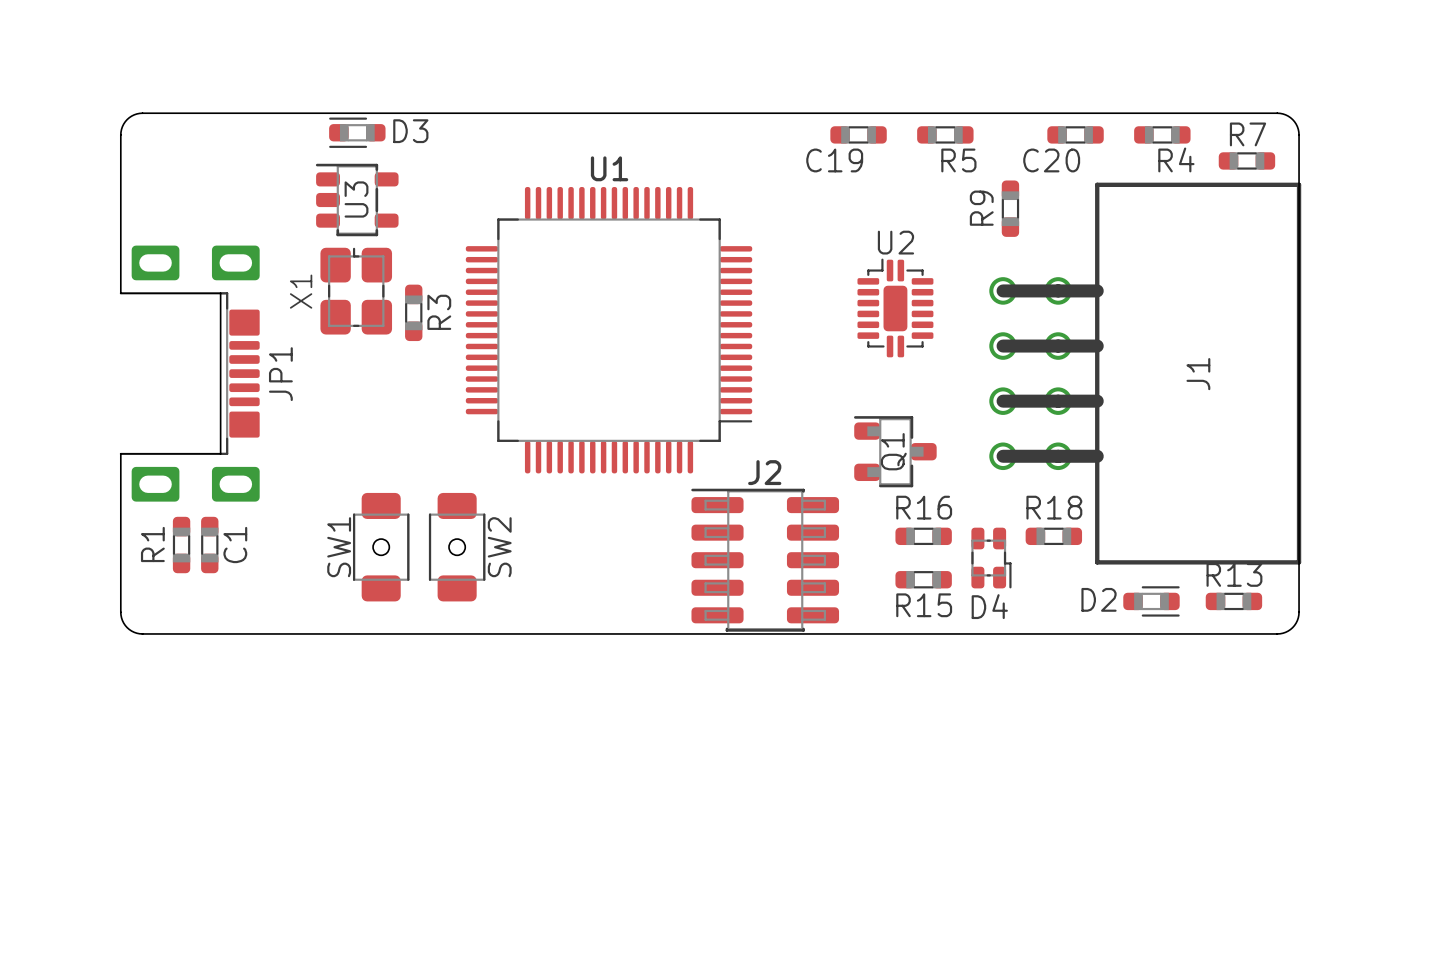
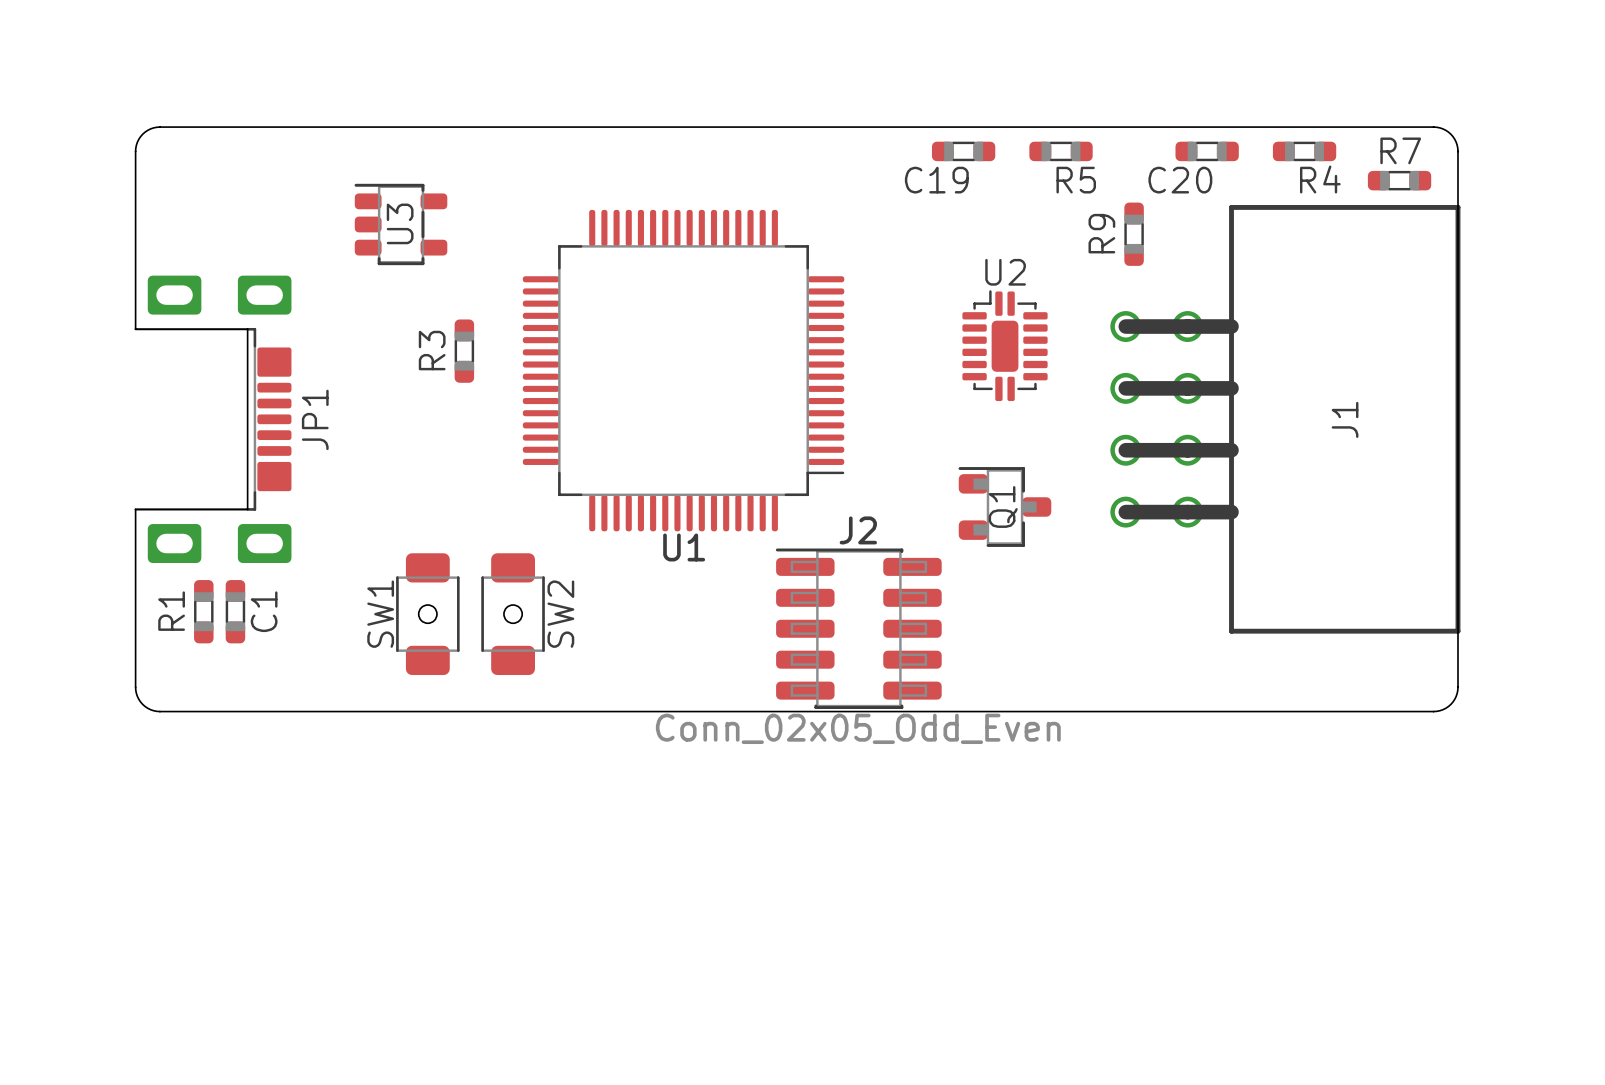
D3: (357, 132) -> none
U1 name position: U1 (609, 168) -> U1 (684, 547)
X1: (356, 291) -> none
R3 name position: R3 (439, 312) -> R3 (432, 350)
R16: (923, 536) -> none
R18: (1053, 536) -> none
D4: (991, 558) -> none
R15: (923, 579) -> none
D2: (1151, 601) -> none
R13: (1233, 601) -> none
J2 value: none -> Conn_02x05_Odd_Even (858, 728)

